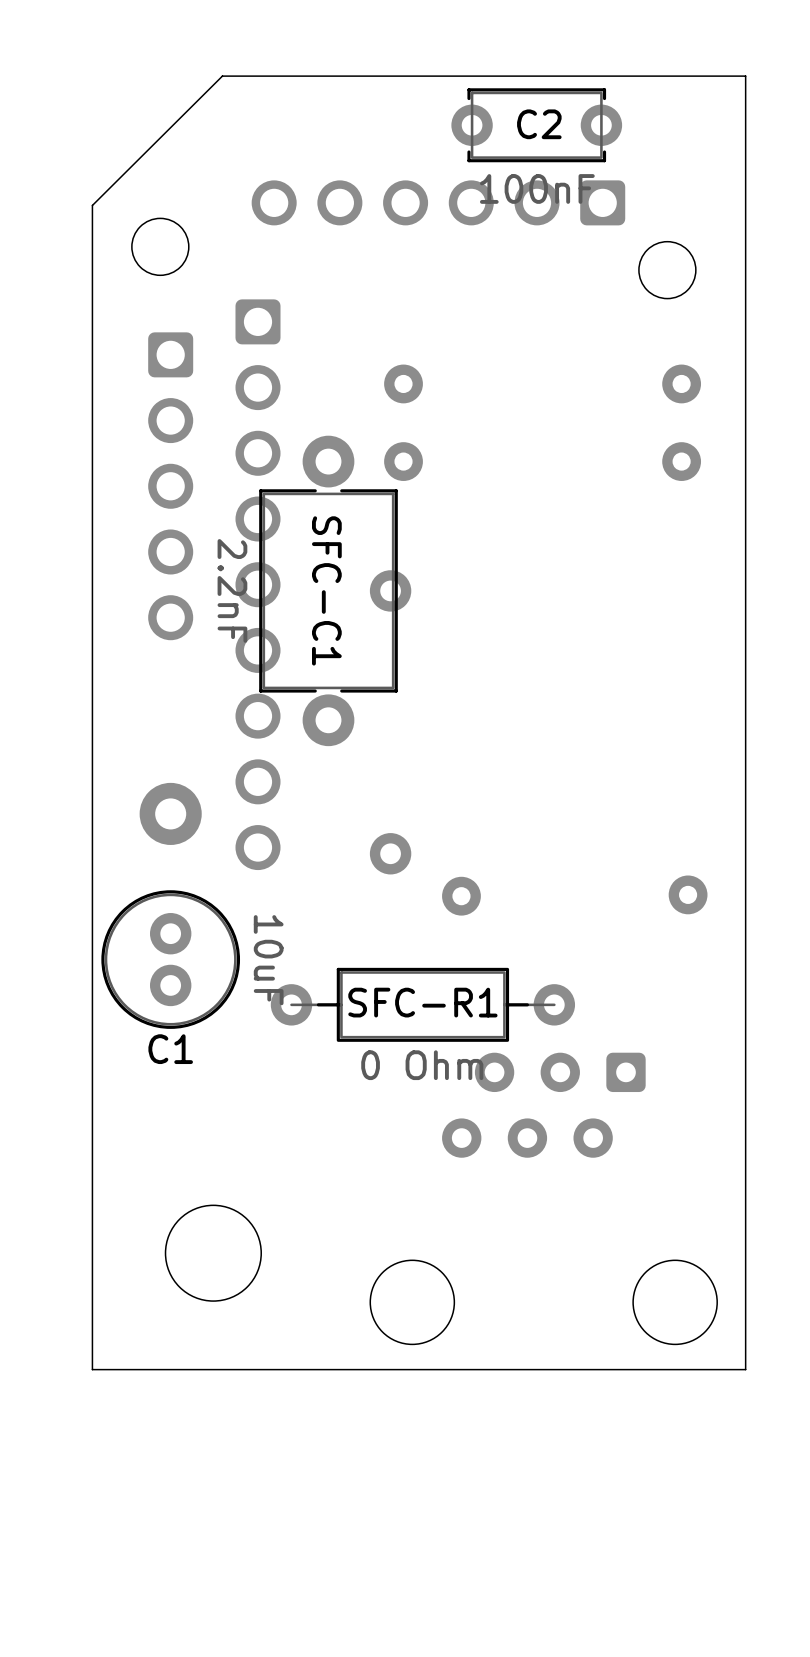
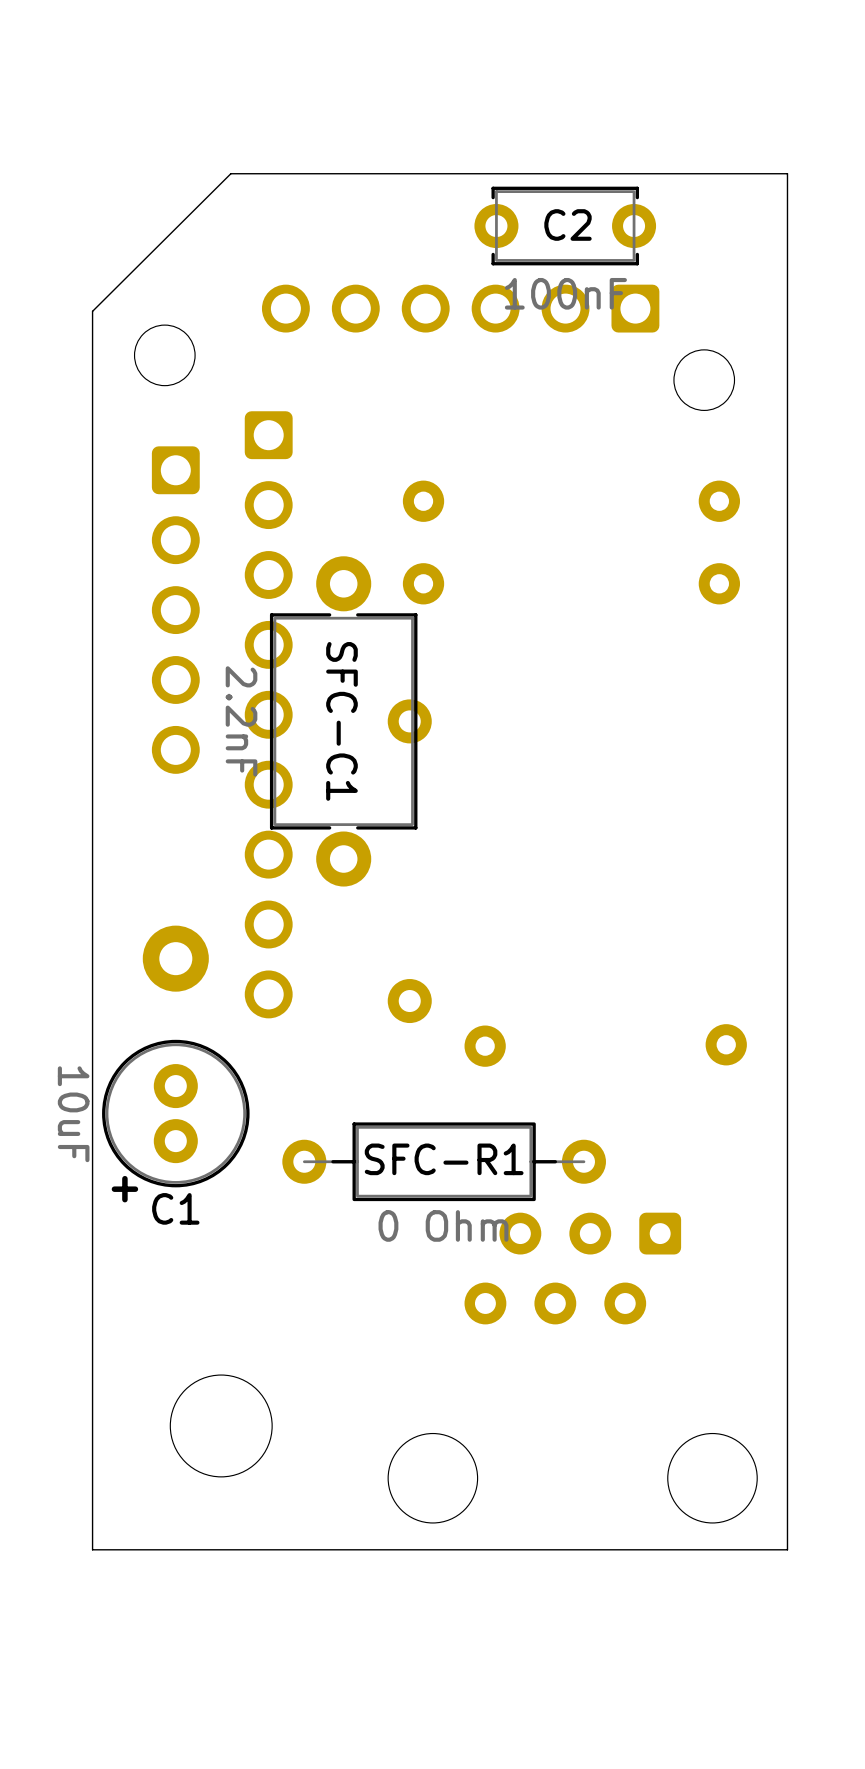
C1 value position: 10uF (268, 960) -> 10uF (73, 1114)
text: none -> + (124, 1189)

